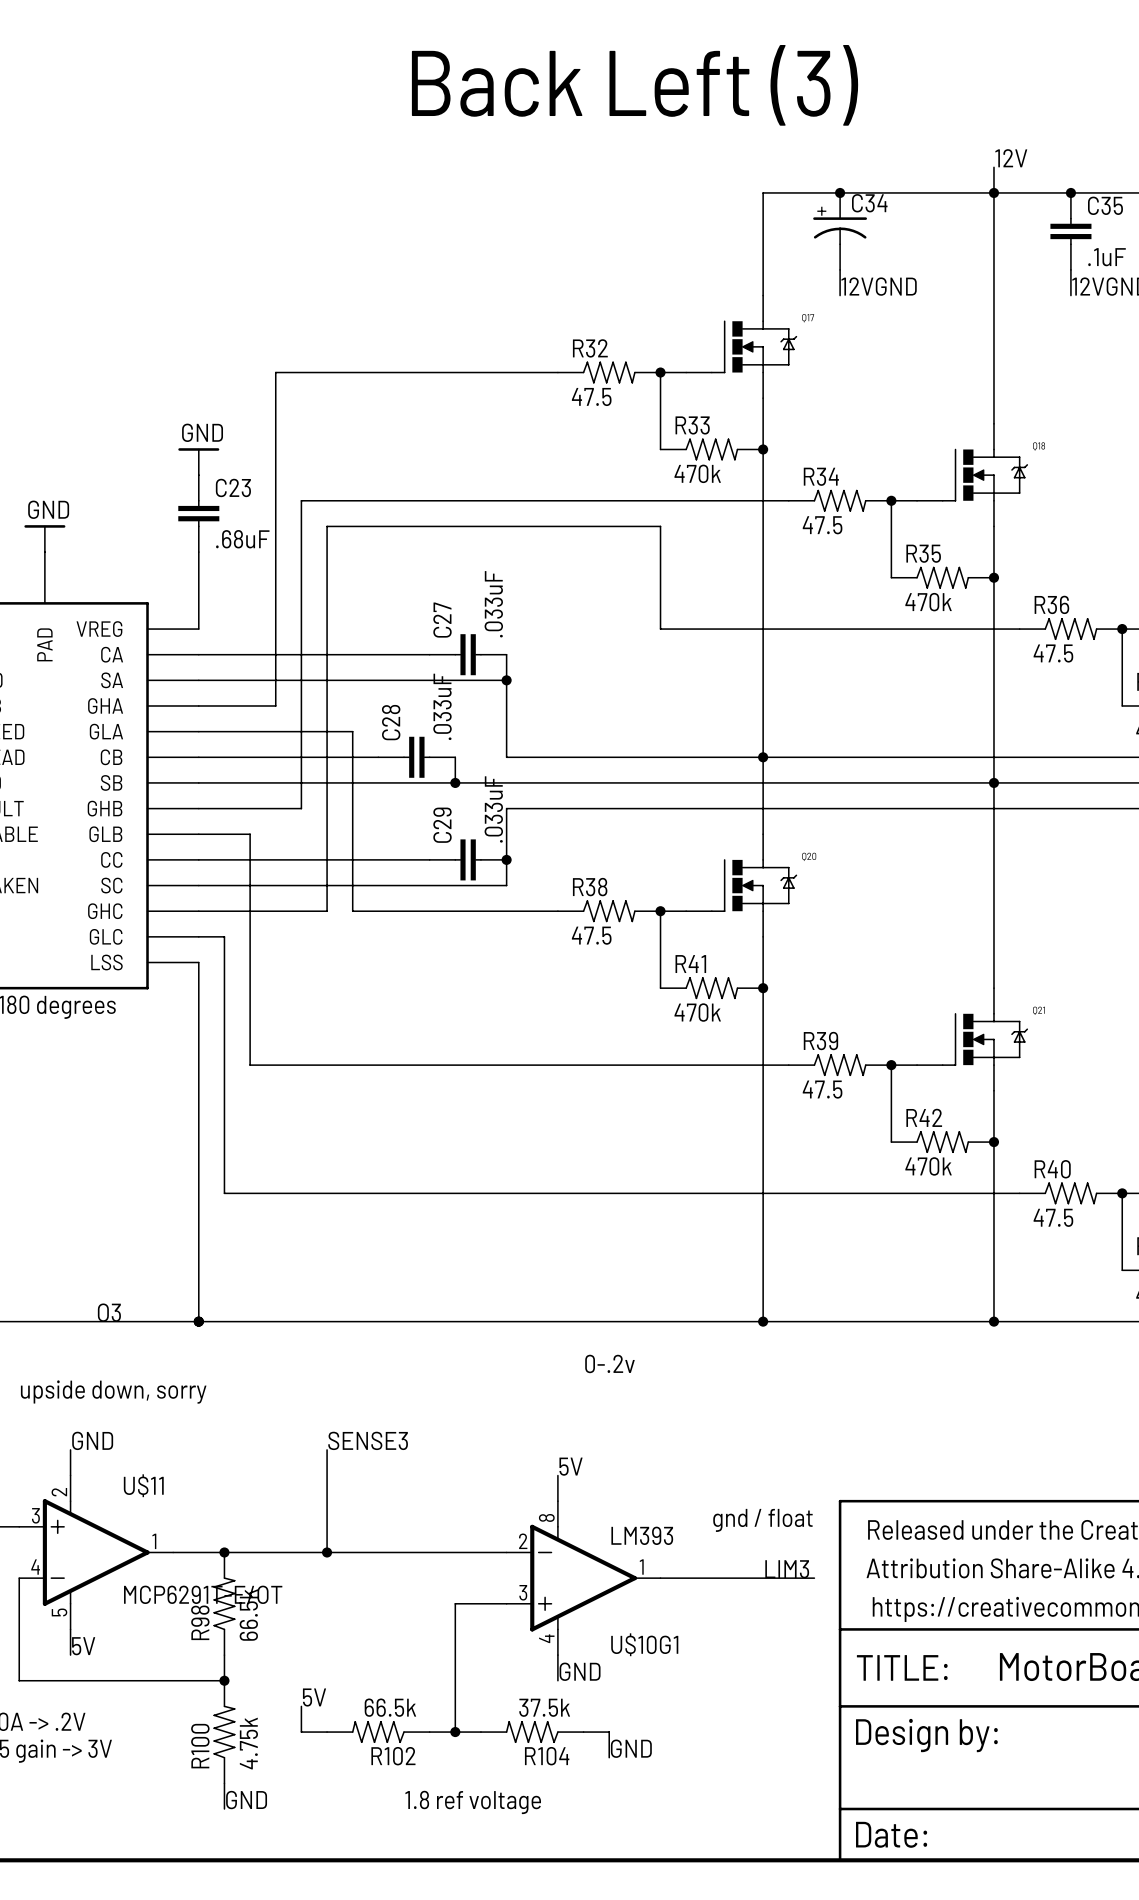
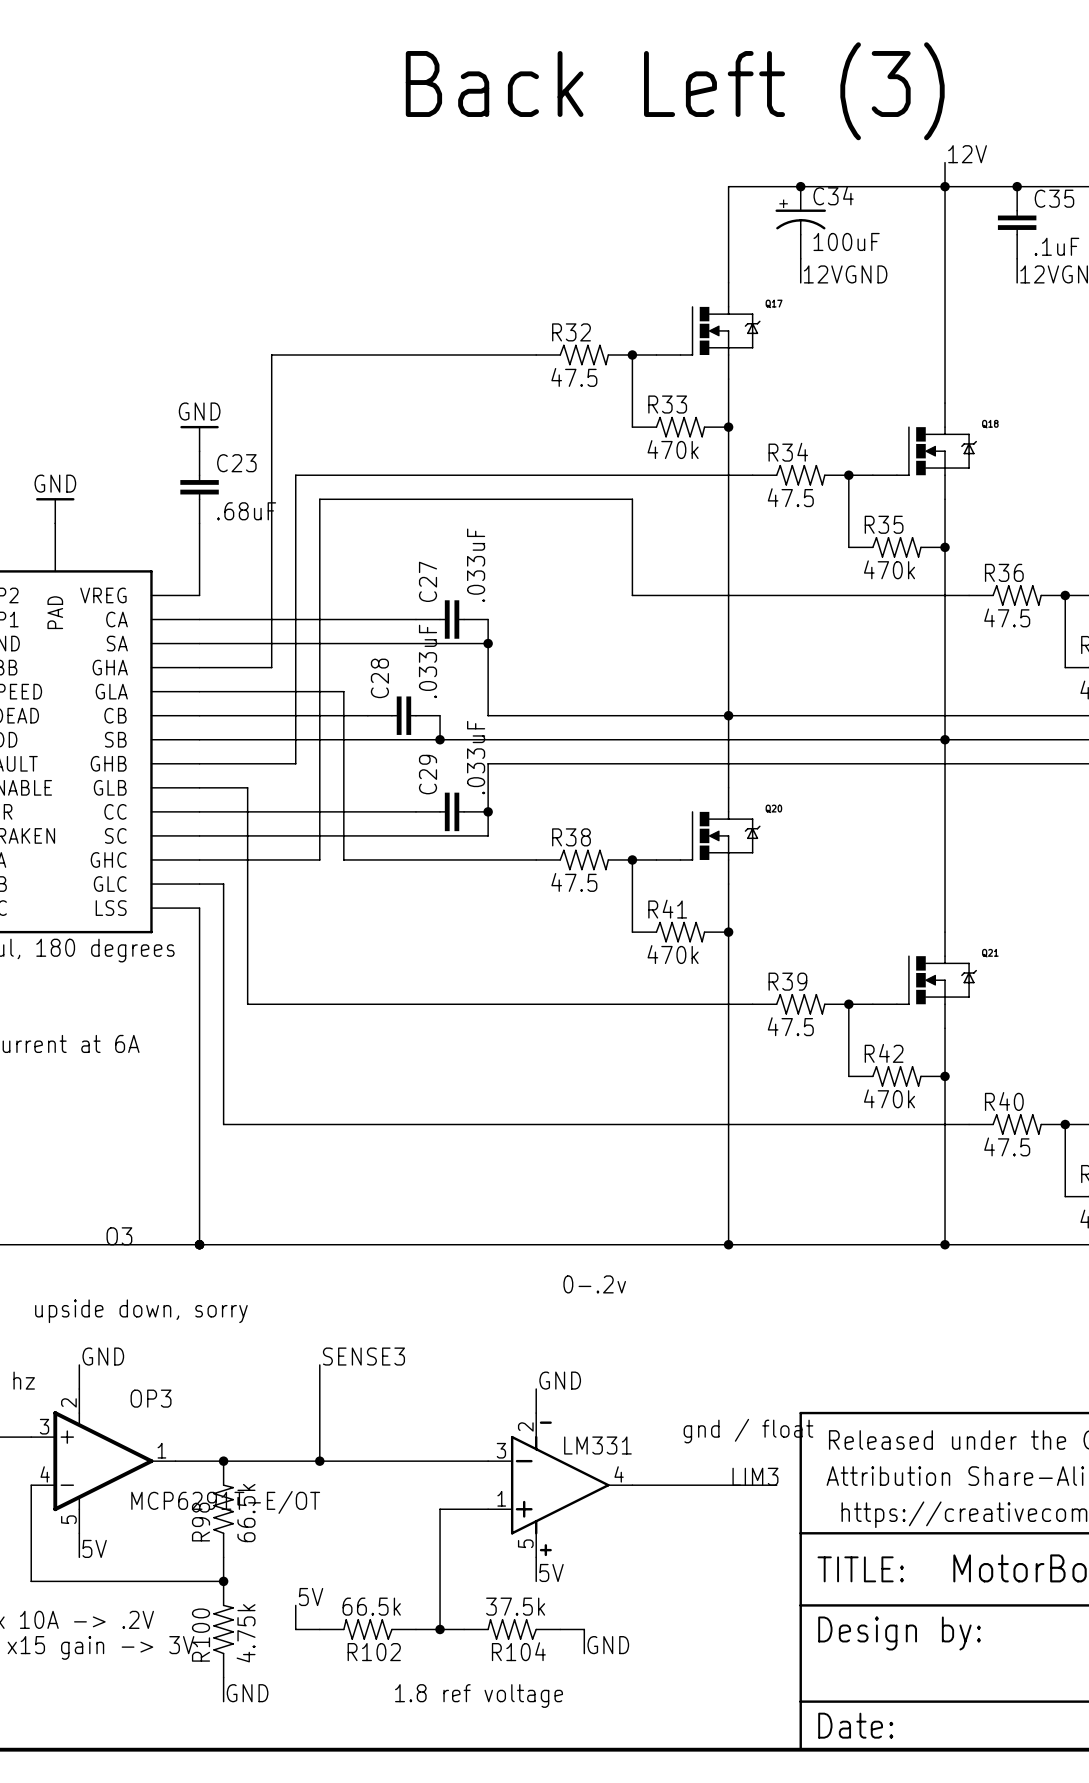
C34 value: none -> 100uF (846, 241)
label: 5V (571, 1466) -> GND (560, 1380)
U$11 name: U$11 (143, 1485) -> OP3 (151, 1398)
U$10G1: LM393 (583, 1578) -> none
part: none -> LM331 (560, 1485)
label: GND (580, 1671) -> 5V (551, 1572)

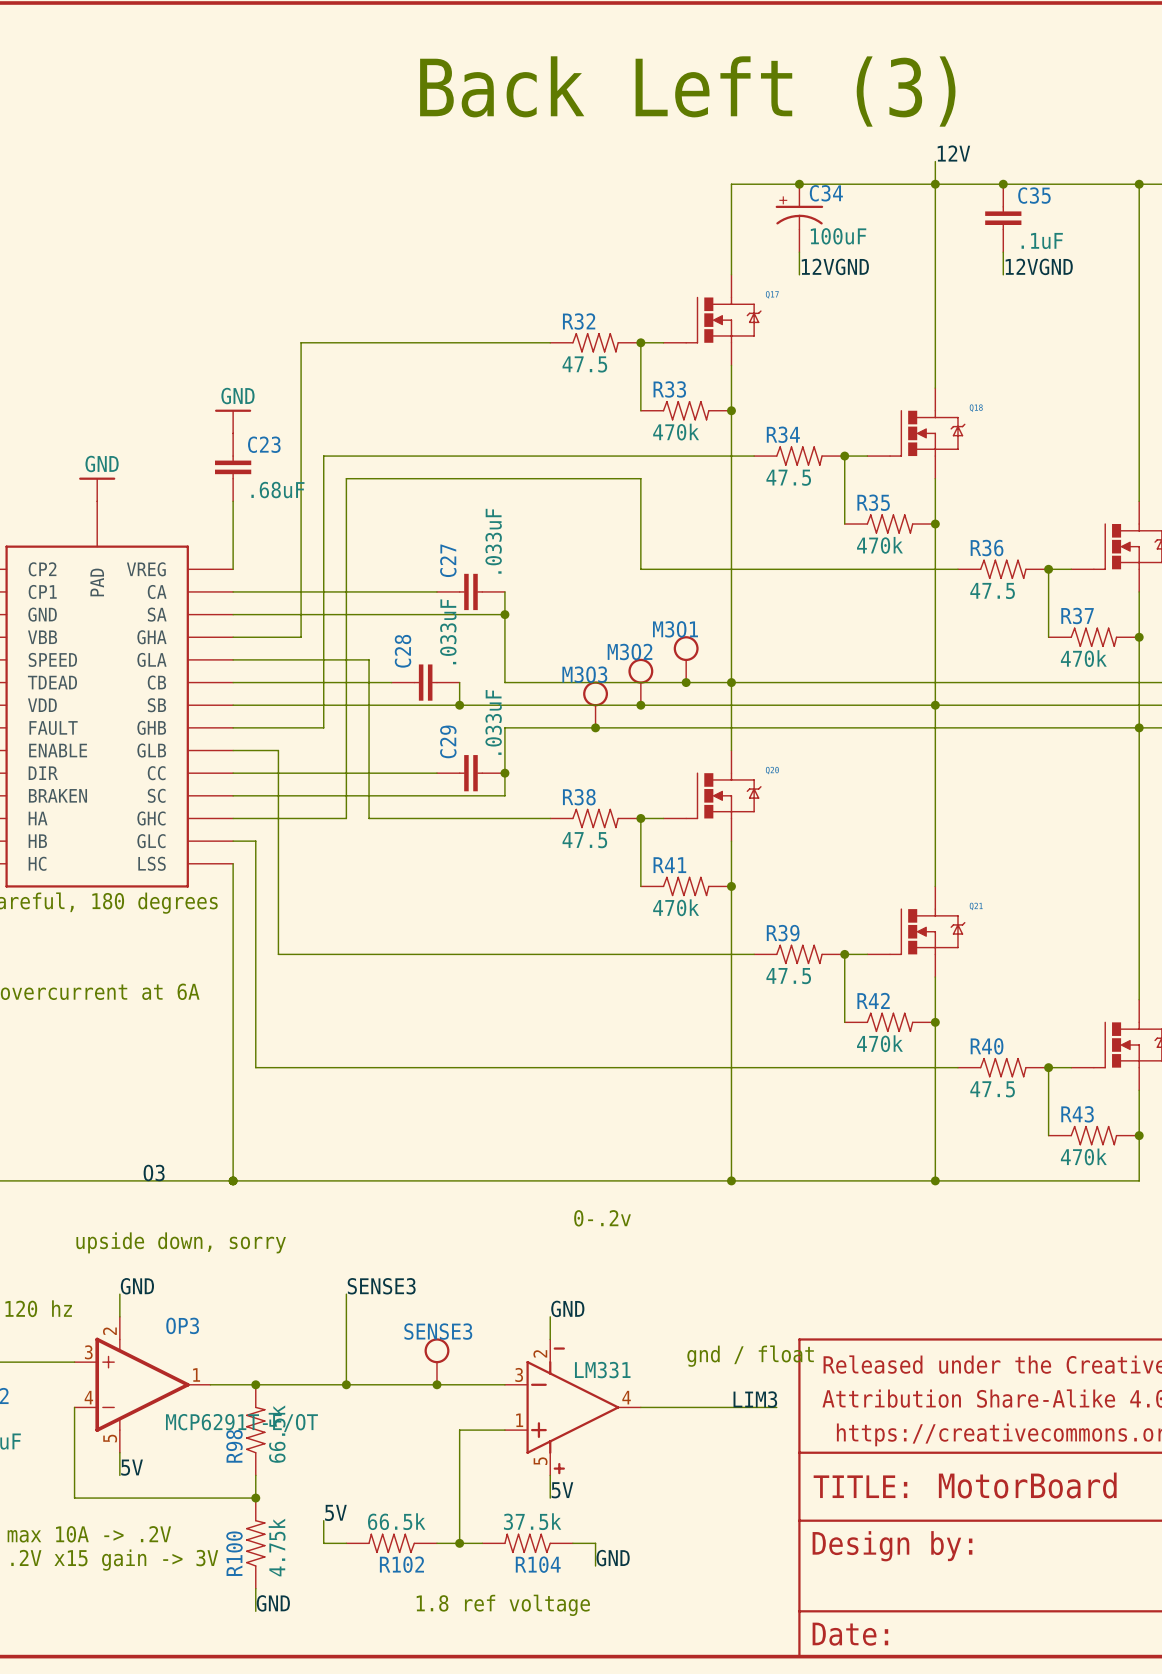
M3O1: none -> (686, 659)
M3O2: none -> (640, 682)
junction: none -> (686, 682)
M3O3: none -> (595, 704)
junction: none -> (640, 705)
junction: none -> (595, 727)
SENSE3: none -> (436, 1361)
junction: none -> (436, 1384)

